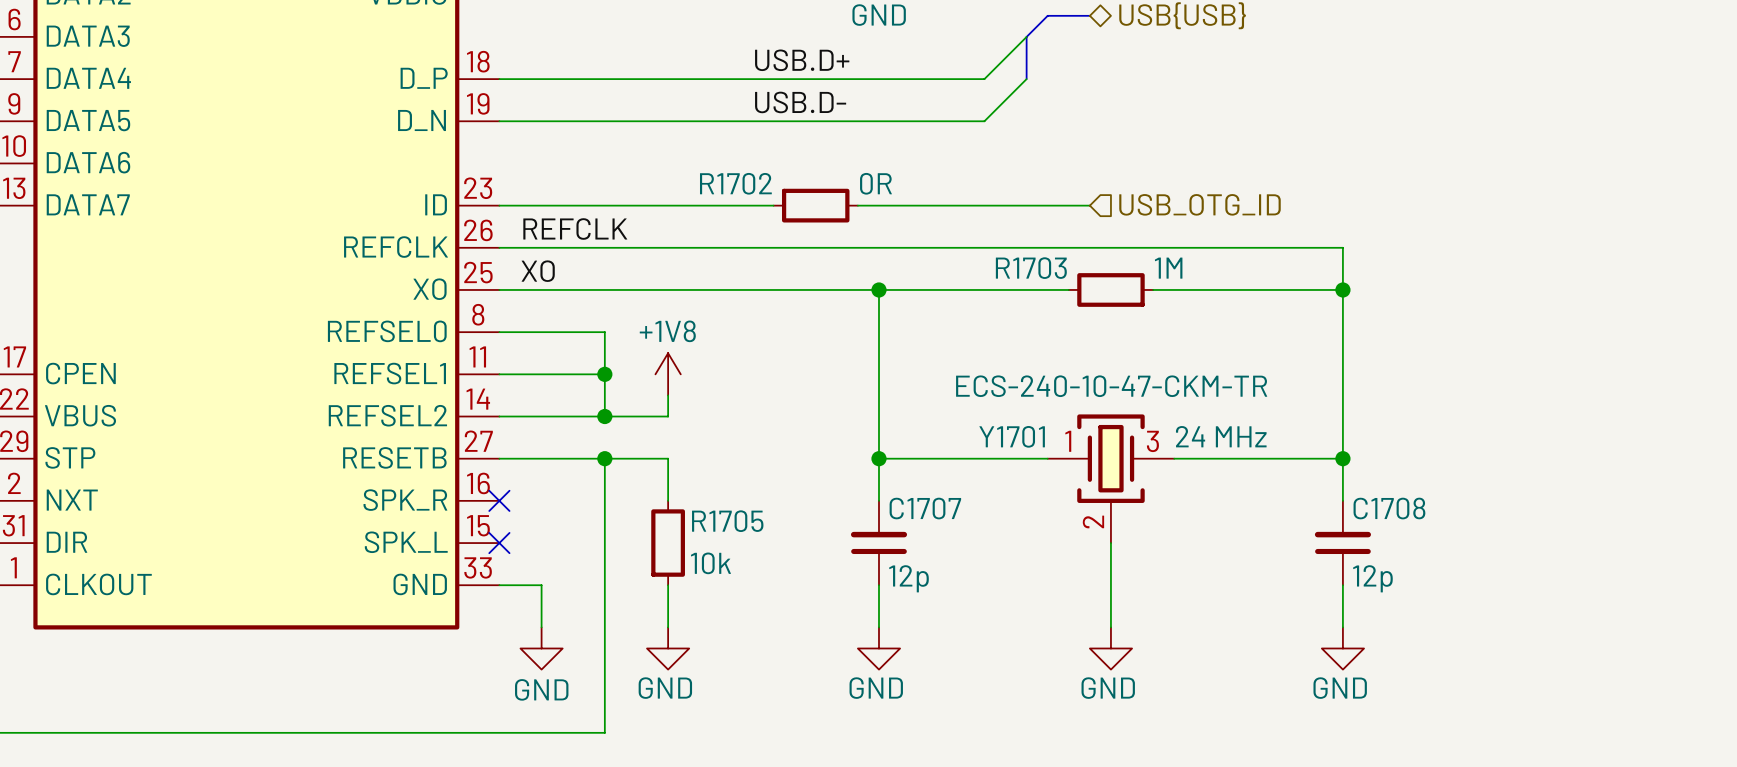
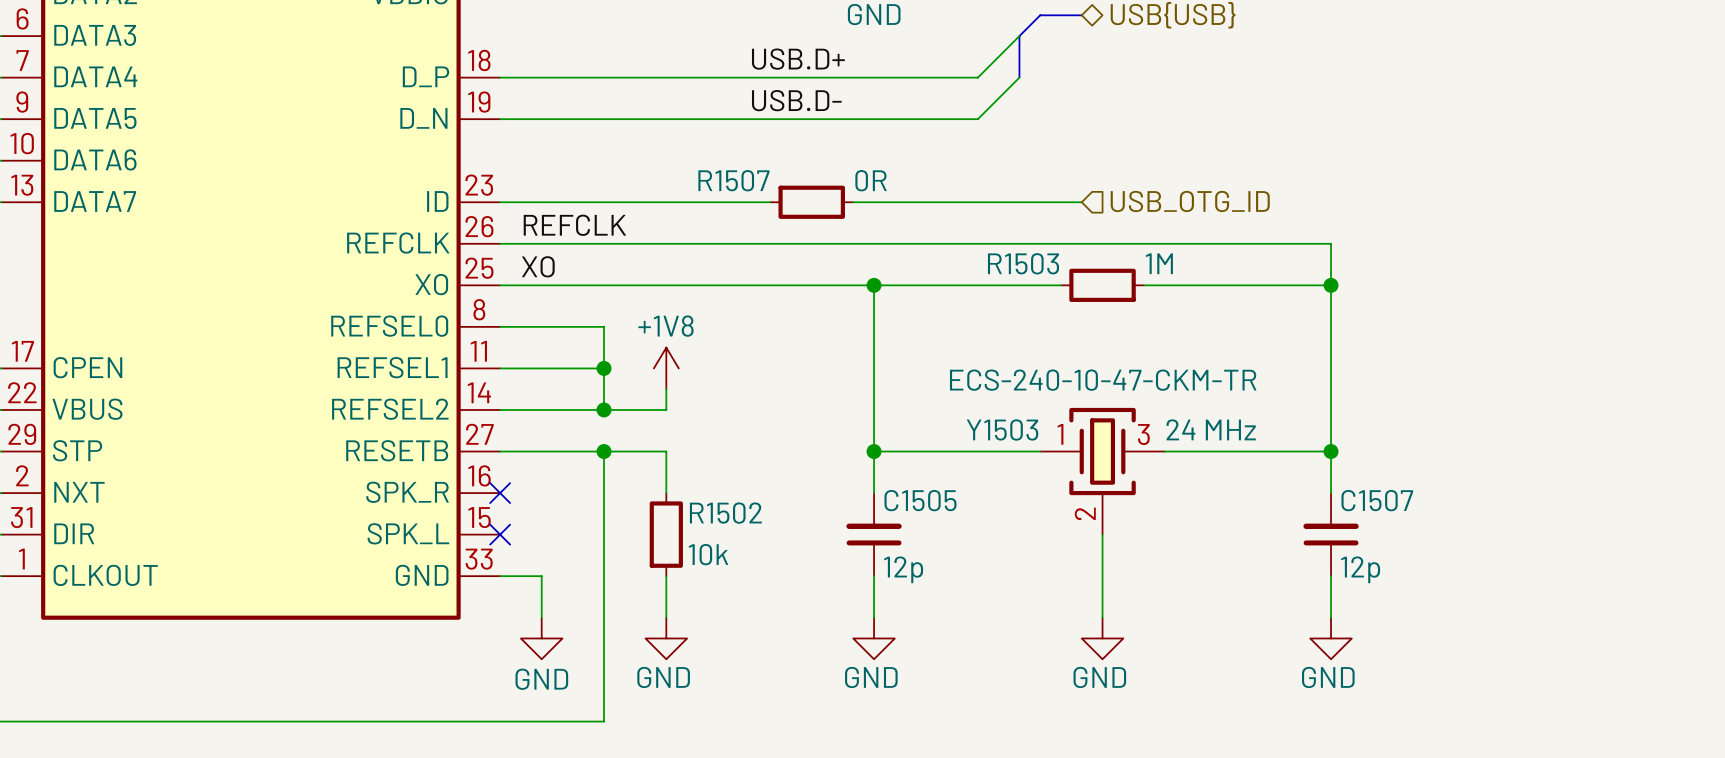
R1702 name: R1702 (735, 183) -> R1507 (733, 180)
R1703 name: R1703 (1031, 268) -> R1503 (1023, 263)
Y1701 name: Y1701 (1012, 436) -> Y1503 (1002, 429)
C1707 name: C1707 (925, 508) -> C1505 (920, 500)
C1708 name: C1708 (1389, 508) -> C1507 (1377, 500)
R1705 name: R1705 (727, 521) -> R1502 (725, 513)

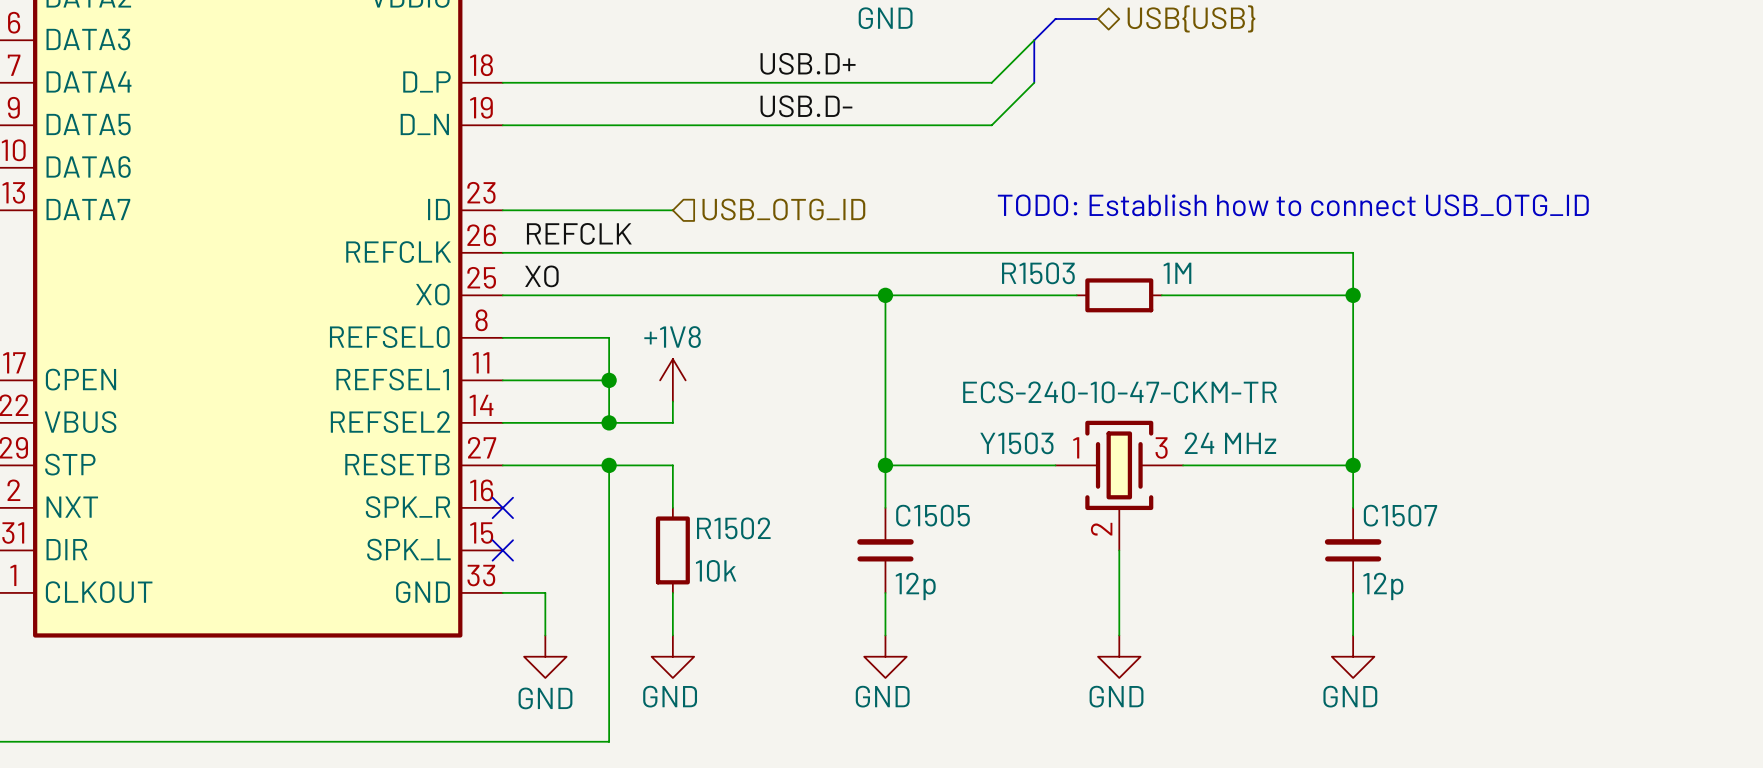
text: none -> TODO: Establish how to connect USB_OTG_ID (1293, 205)
hierarchical label: none -> USB_OTG_ID (783, 209)
hierarchical label: USB_OTG_ID (1190, 201) -> none
wire: (666, 202) (770, 202) -> none
R1507: (811, 202) -> none
wire: (853, 202) (1081, 202) -> none

